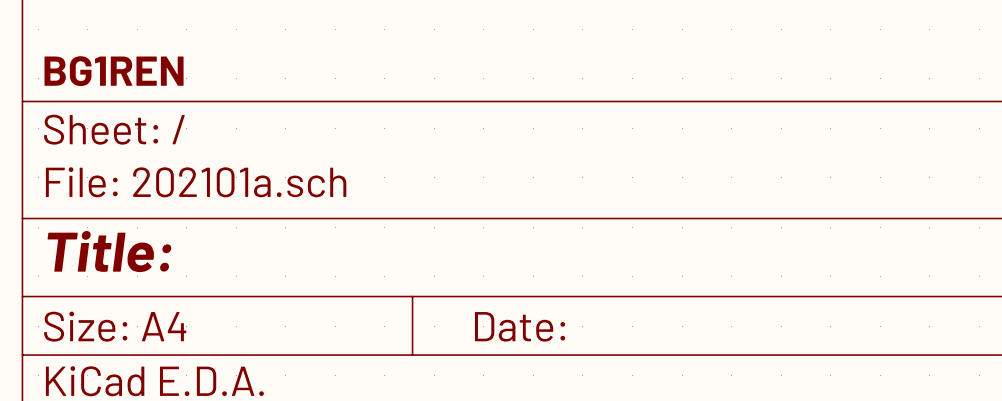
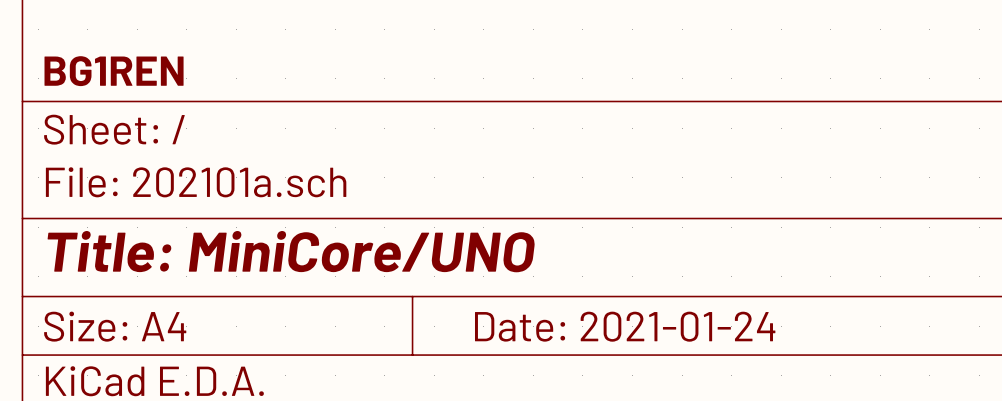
title block: Title: (109, 251) -> Title: MiniCore/UNO (291, 251)
title block: Date: (520, 326) -> Date: 2021-01-24 (625, 326)

